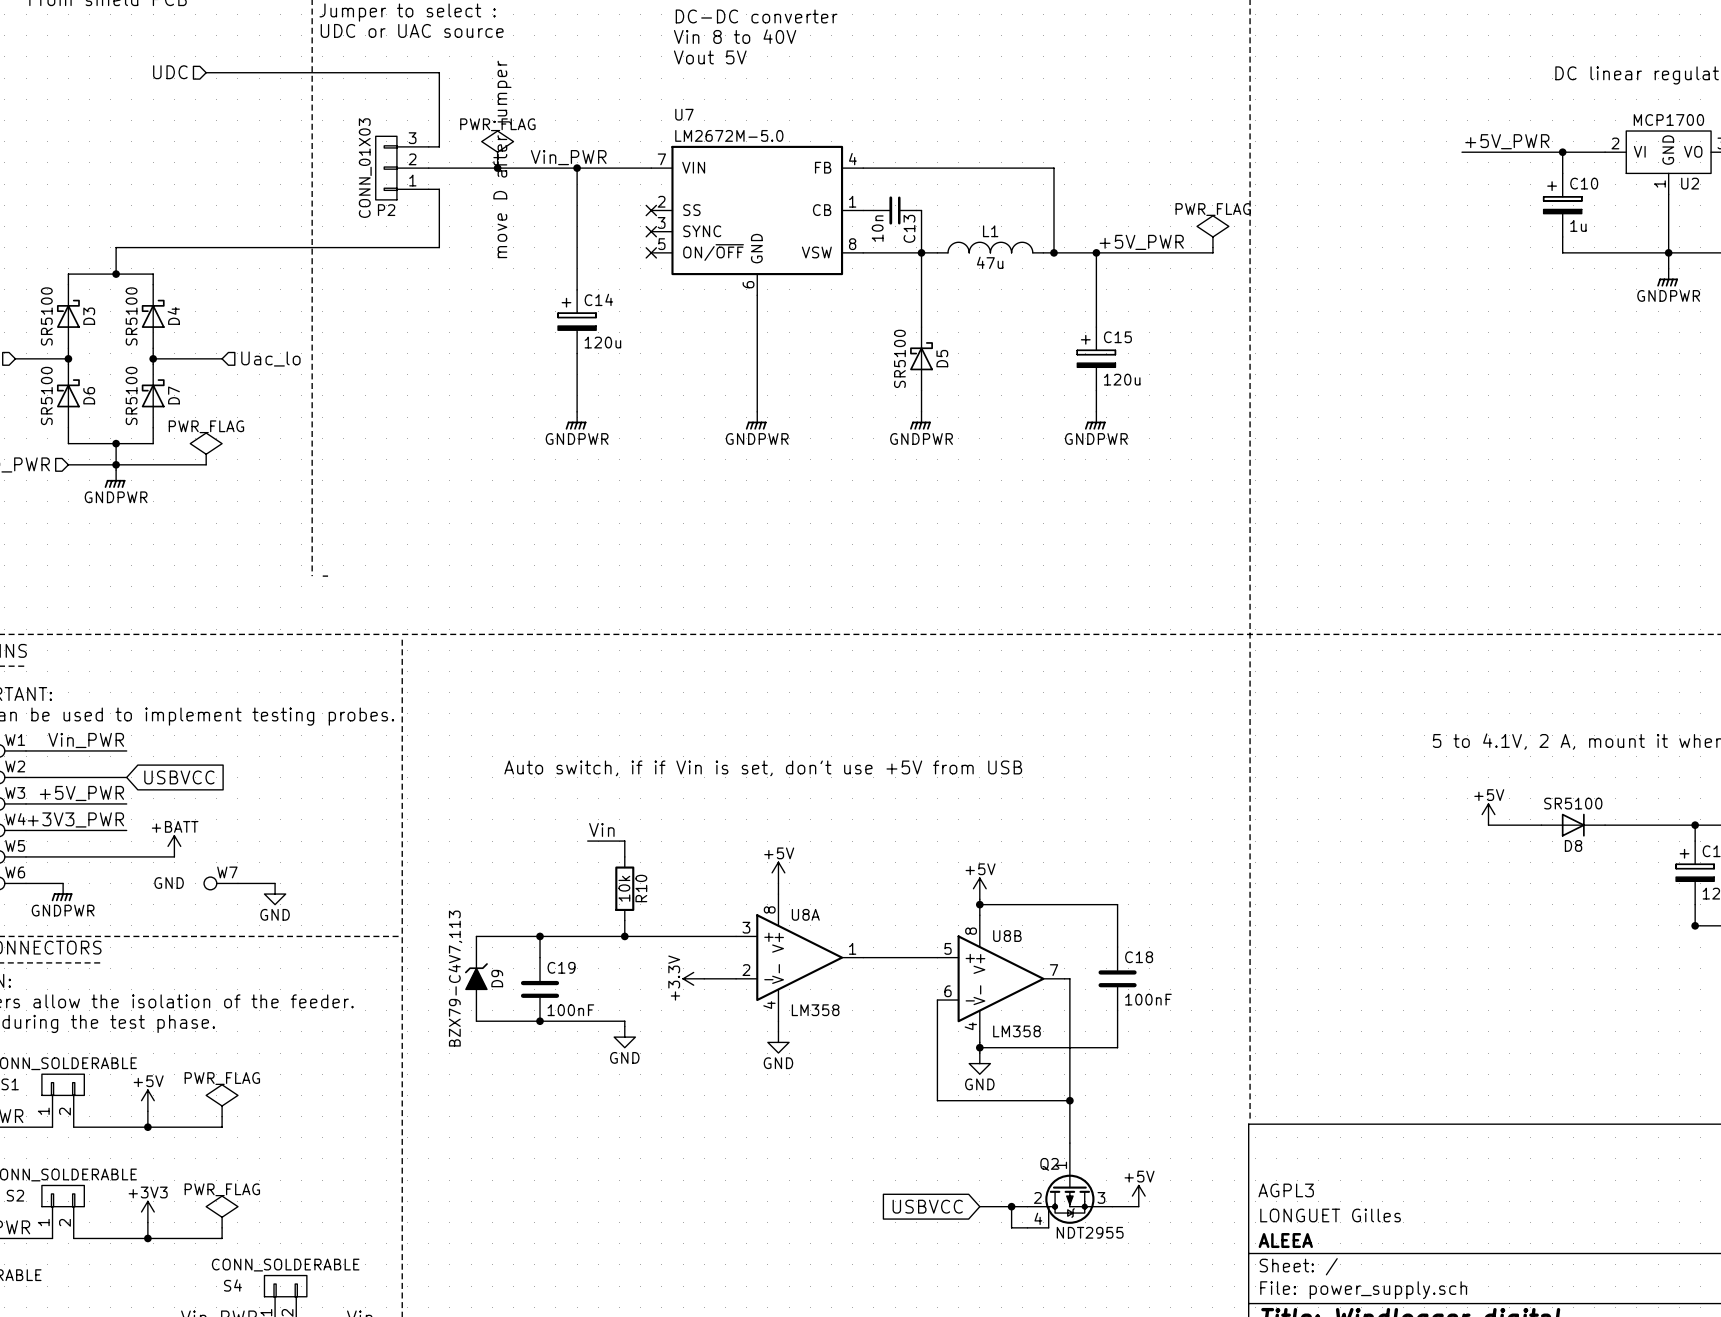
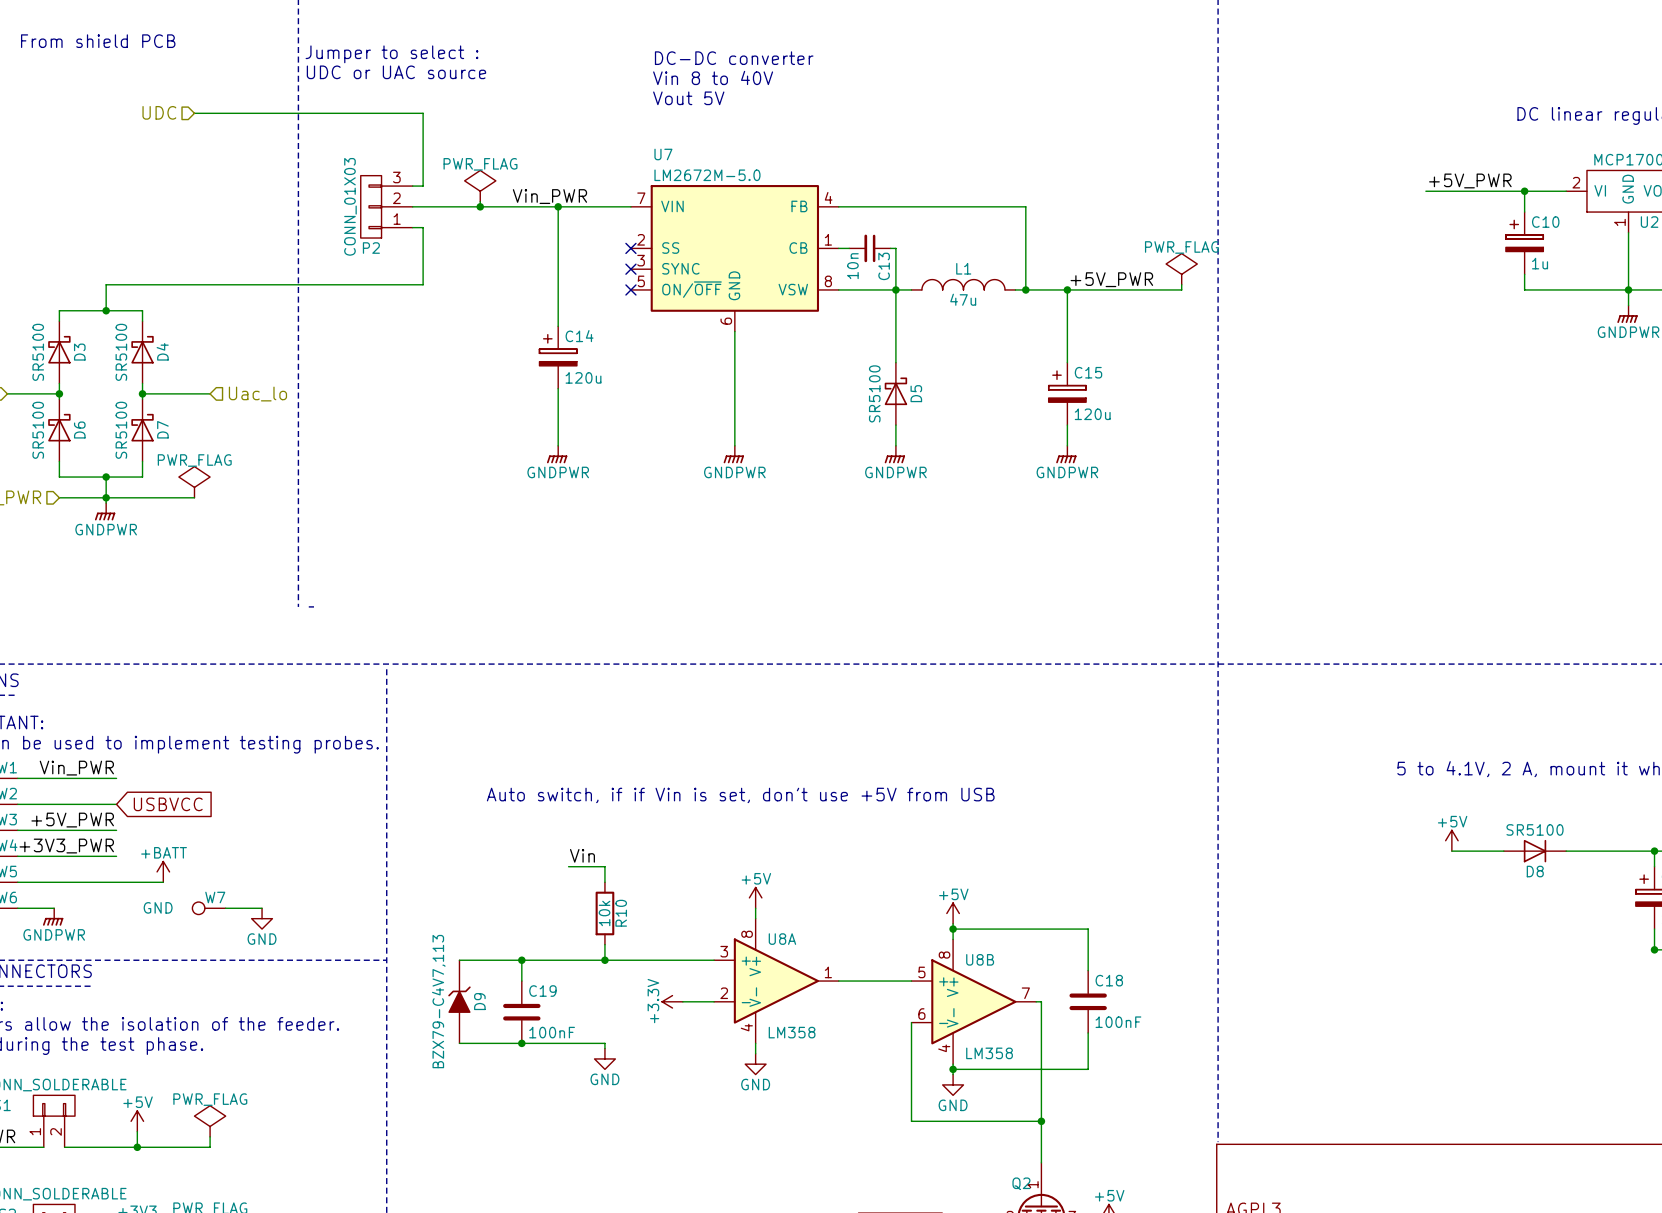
text: move D after jumper (502, 159) -> none

